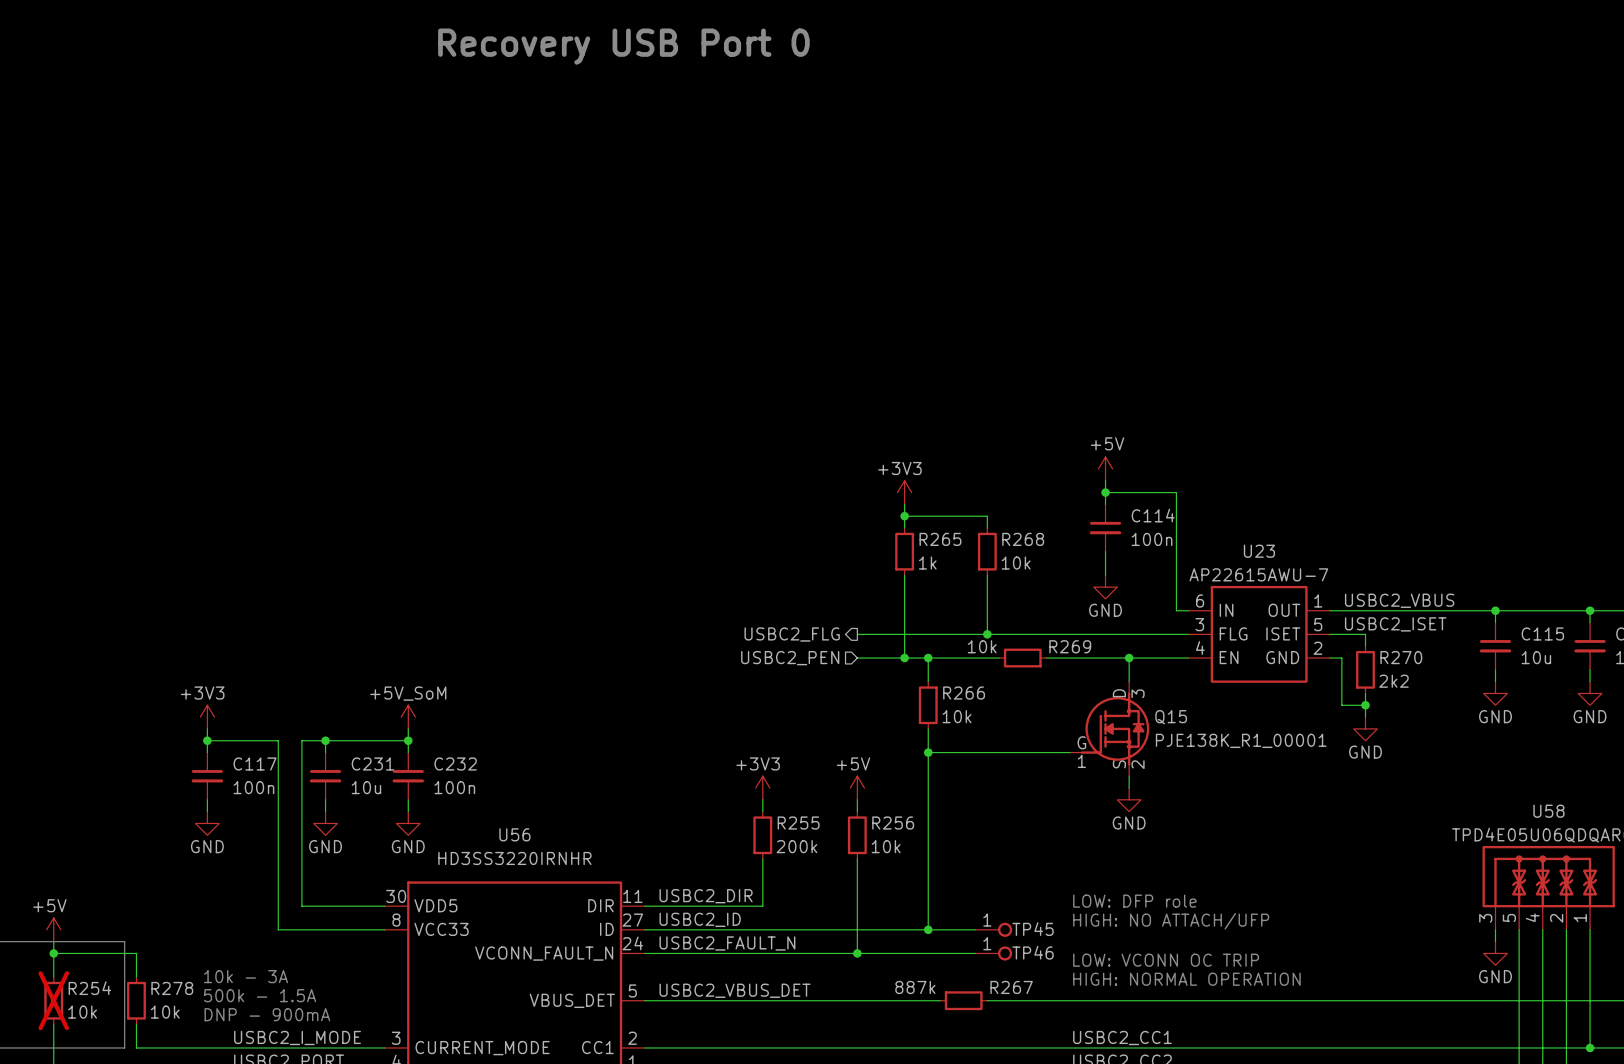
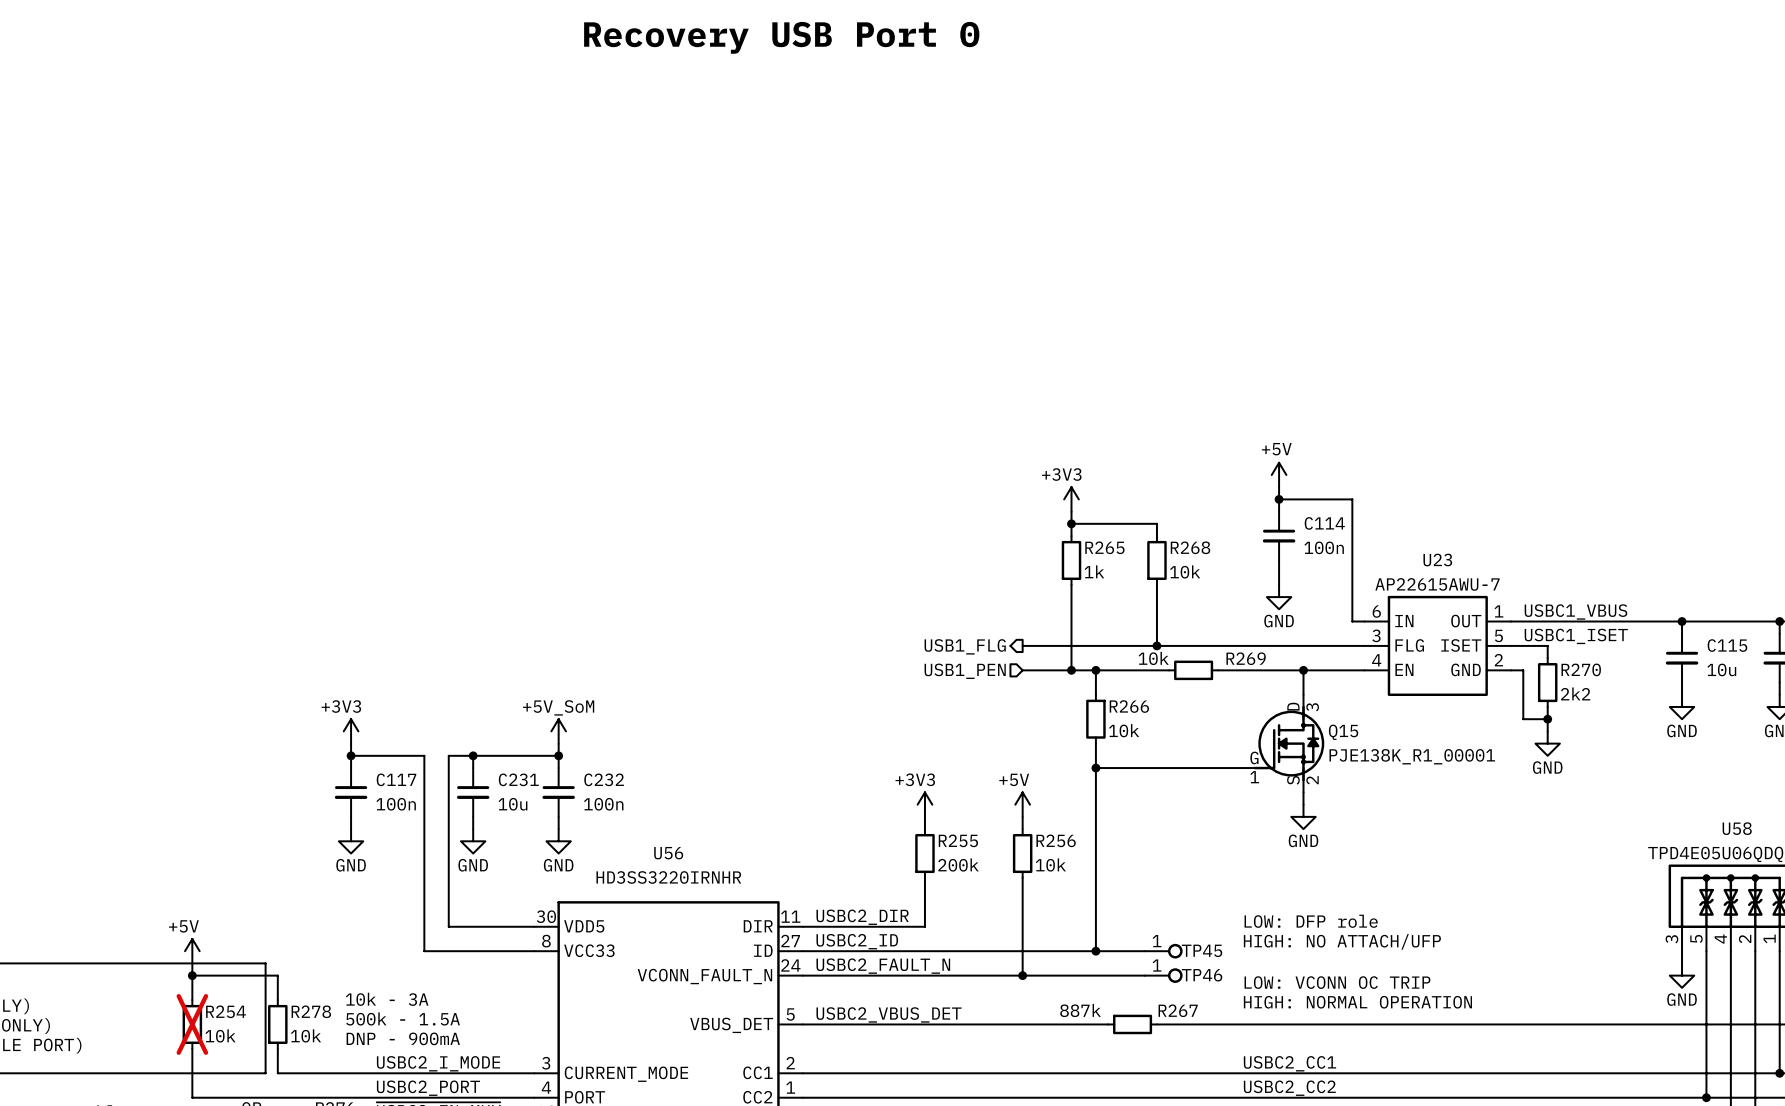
label: USBC2_VBUS (1399, 600) -> USBC1_VBUS (1575, 611)
label: USBC2_ISET (1395, 624) -> USBC1_ISET (1576, 636)
hierarchical label: USBC2_FLG (792, 634) -> USB1_FLG (965, 646)
hierarchical label: USBC2_PEN (790, 658) -> USB1_PEN (965, 671)

